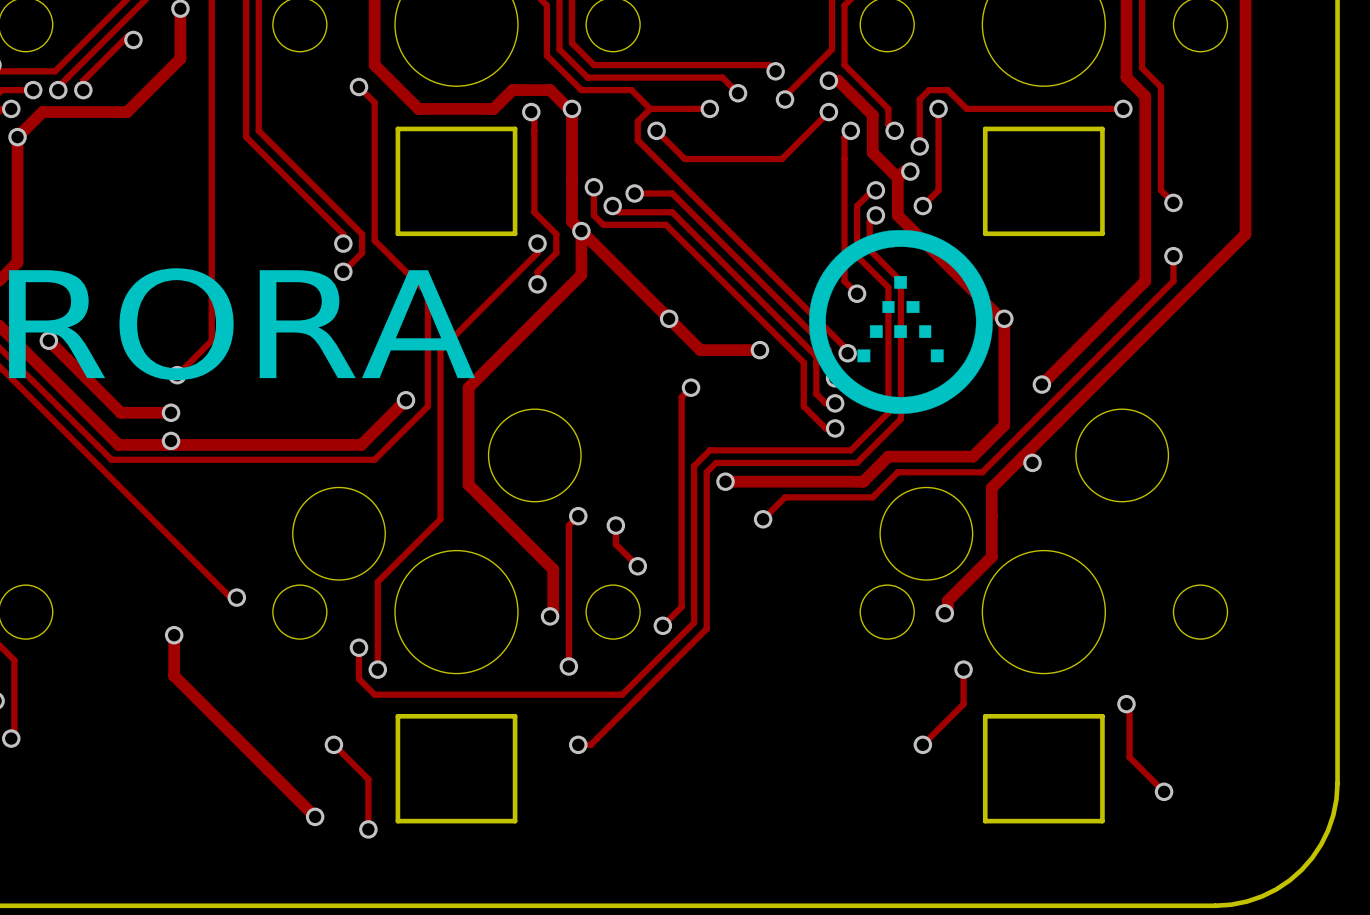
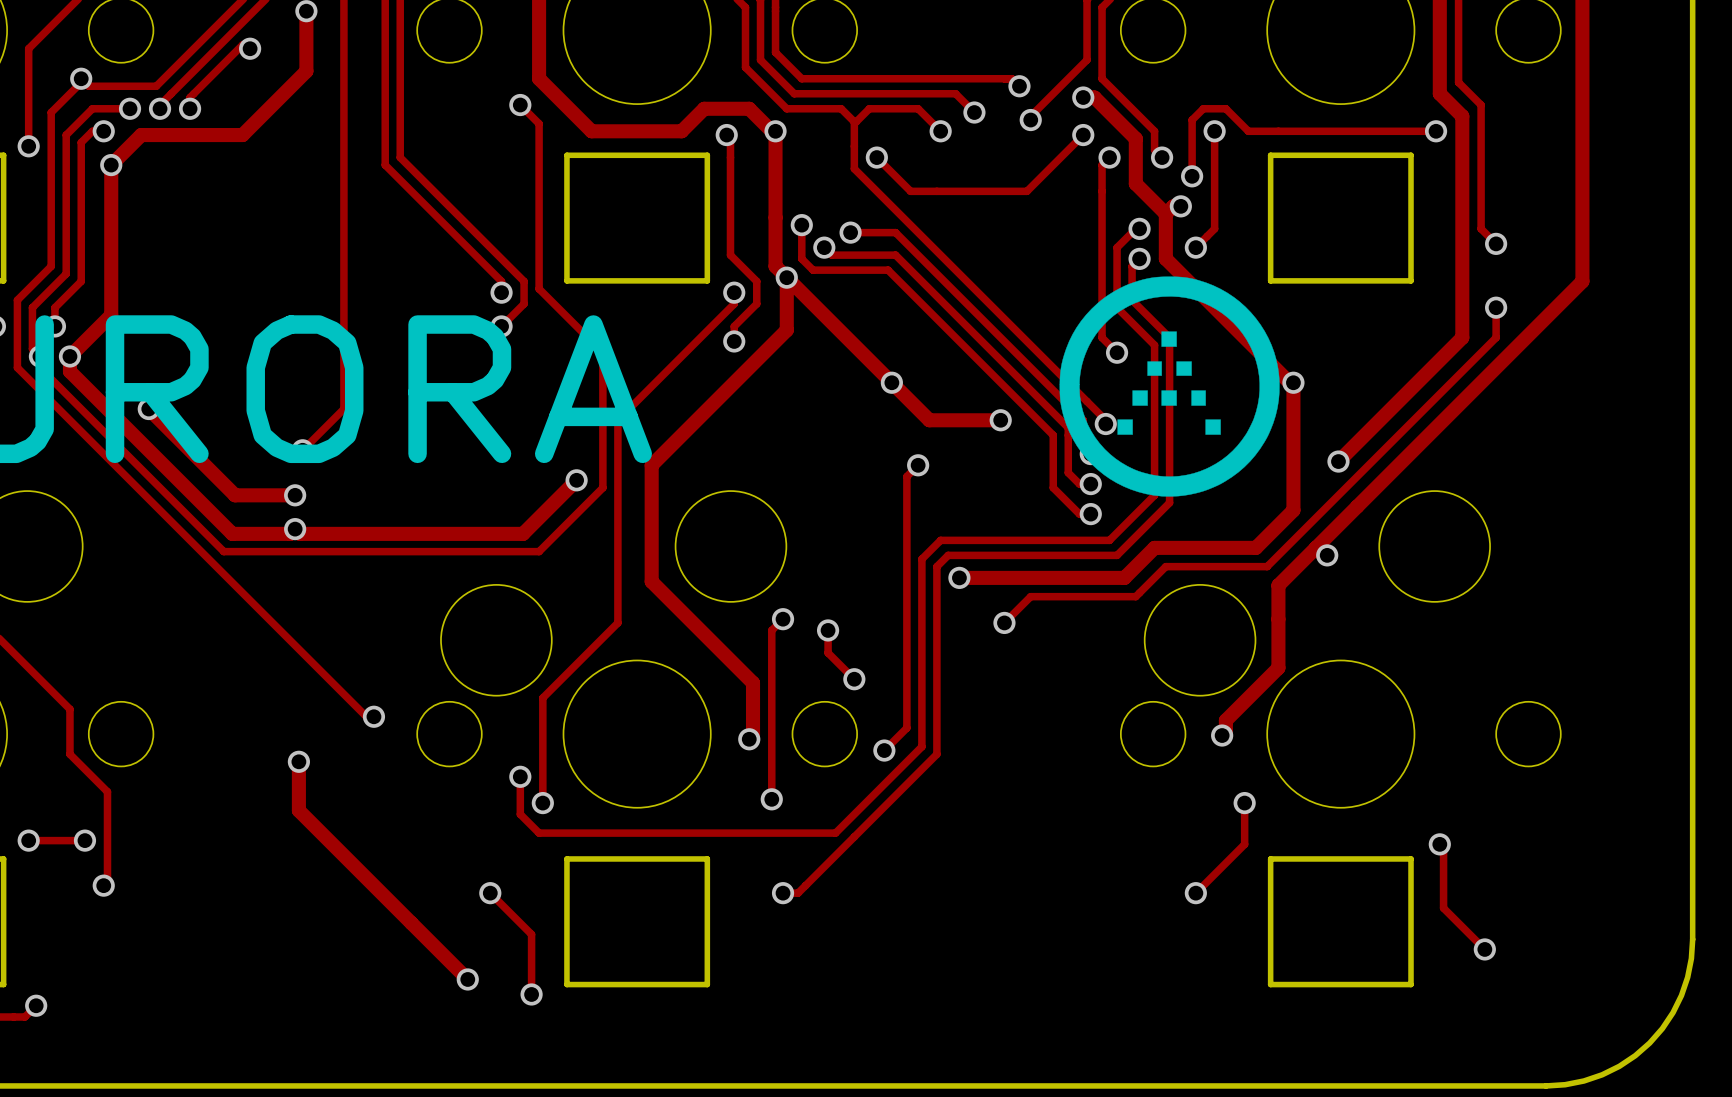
track: (626, 90) (631, 90) (650, 108) -> (841, 108) (854, 121)
track: (650, 108) (709, 108) -> (854, 121) (869, 108) (918, 108) (940, 131)
track: (650, 108) (637, 121) -> (854, 121) (854, 146)

